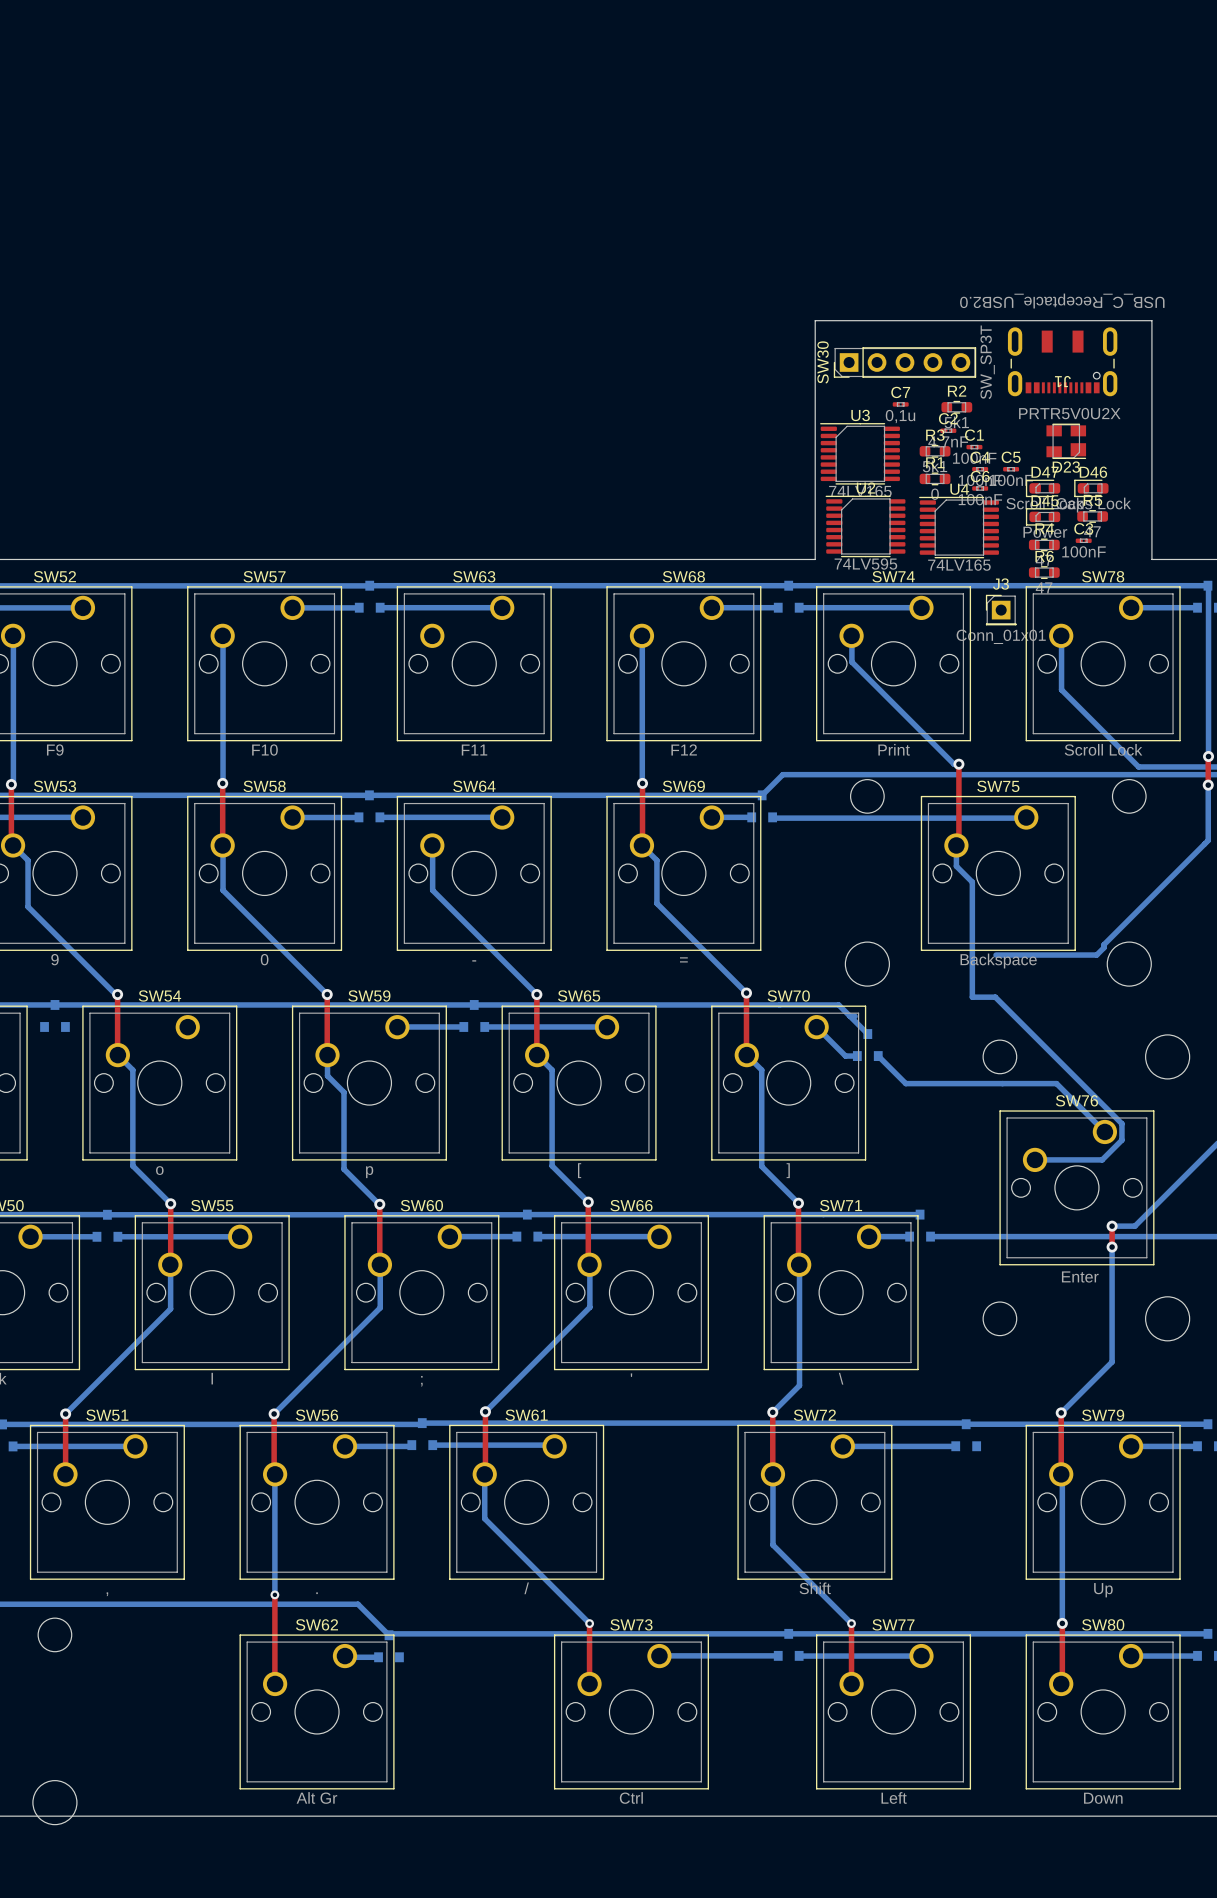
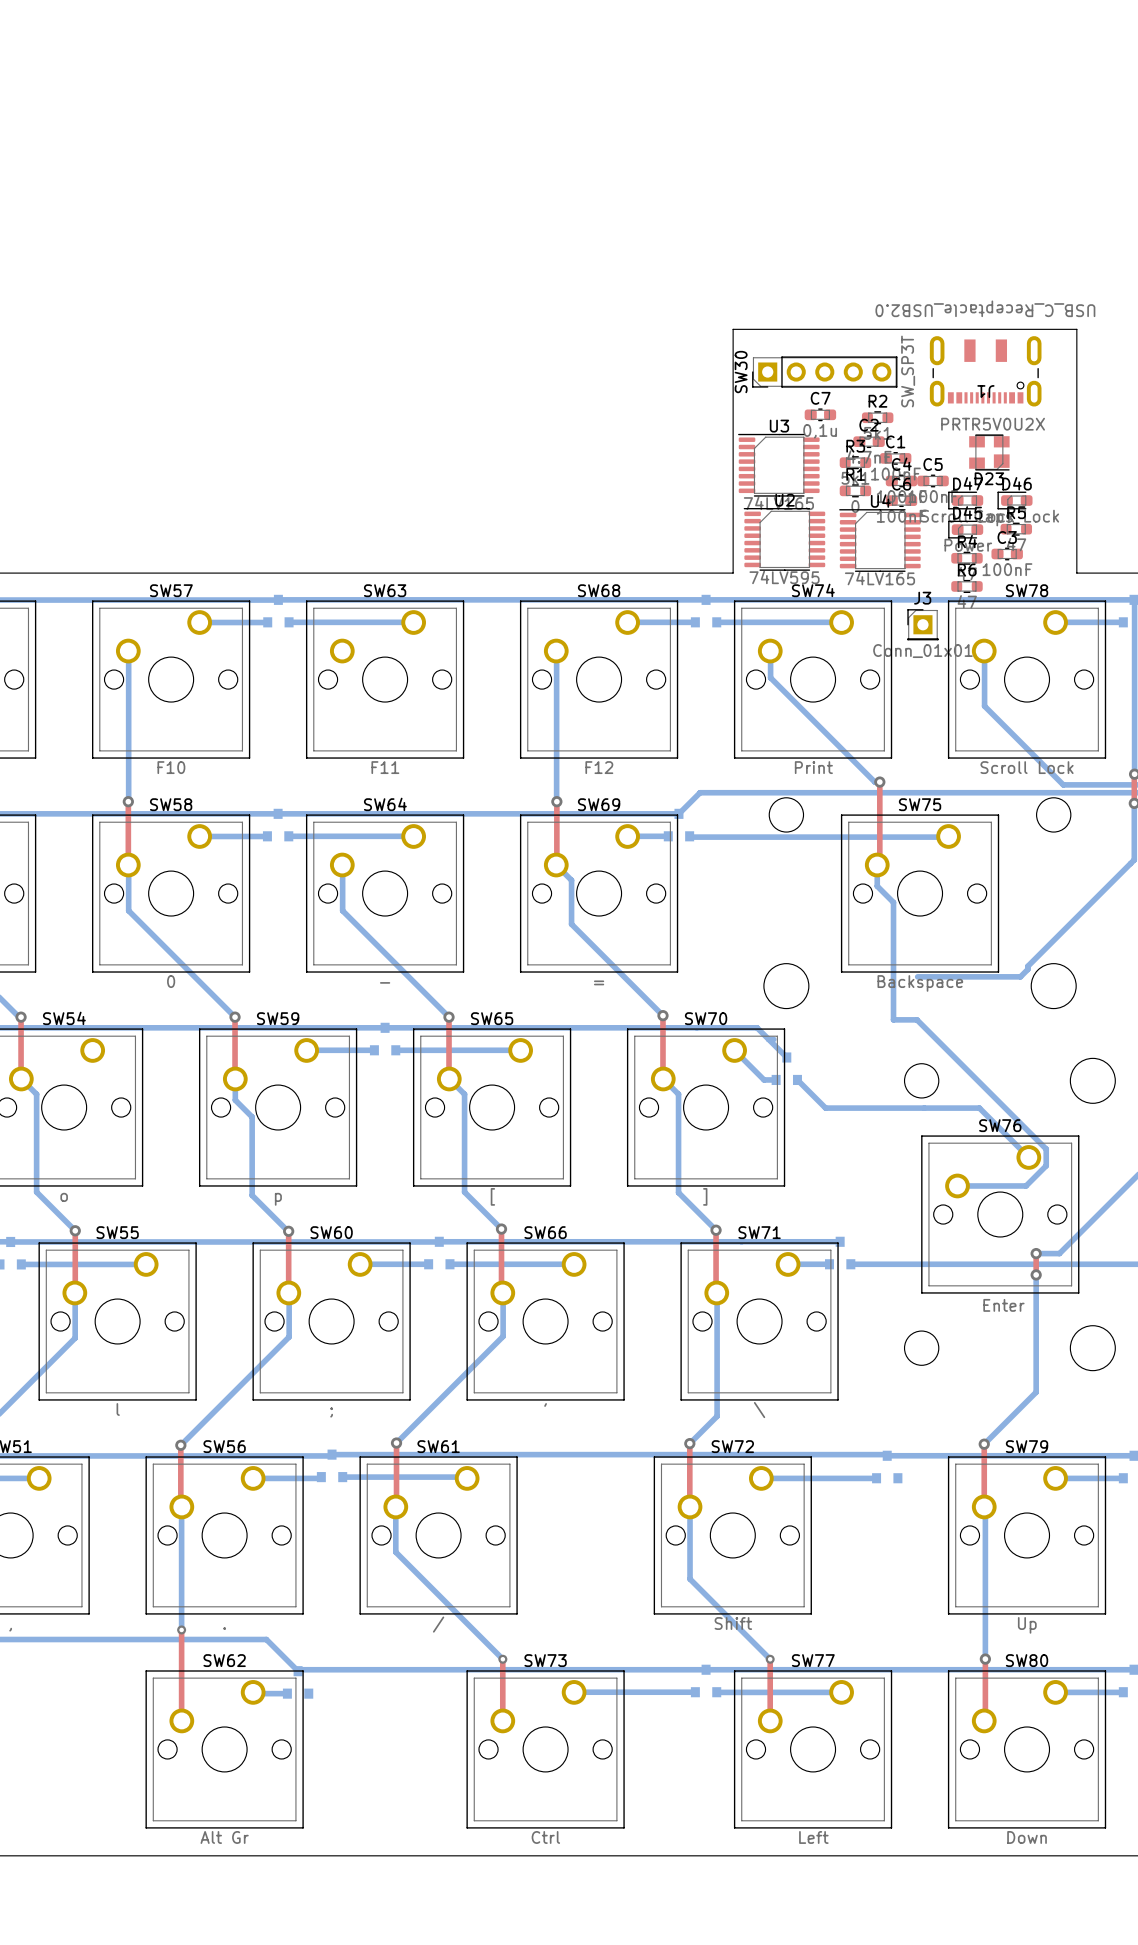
C7 footprint: [892, 402, 909, 407] -> [804, 408, 837, 422]
C2 footprint: [940, 428, 957, 433] -> [853, 435, 885, 449]
C1 footprint: [966, 444, 983, 450] -> [879, 452, 912, 465]
C4 footprint: [972, 467, 989, 472] -> [885, 474, 918, 488]
C5 footprint: [1003, 467, 1020, 472] -> [917, 474, 949, 488]
C6 footprint: [972, 486, 989, 491] -> [885, 494, 918, 508]
C3 footprint: [1075, 538, 1092, 543] -> [991, 547, 1023, 561]

